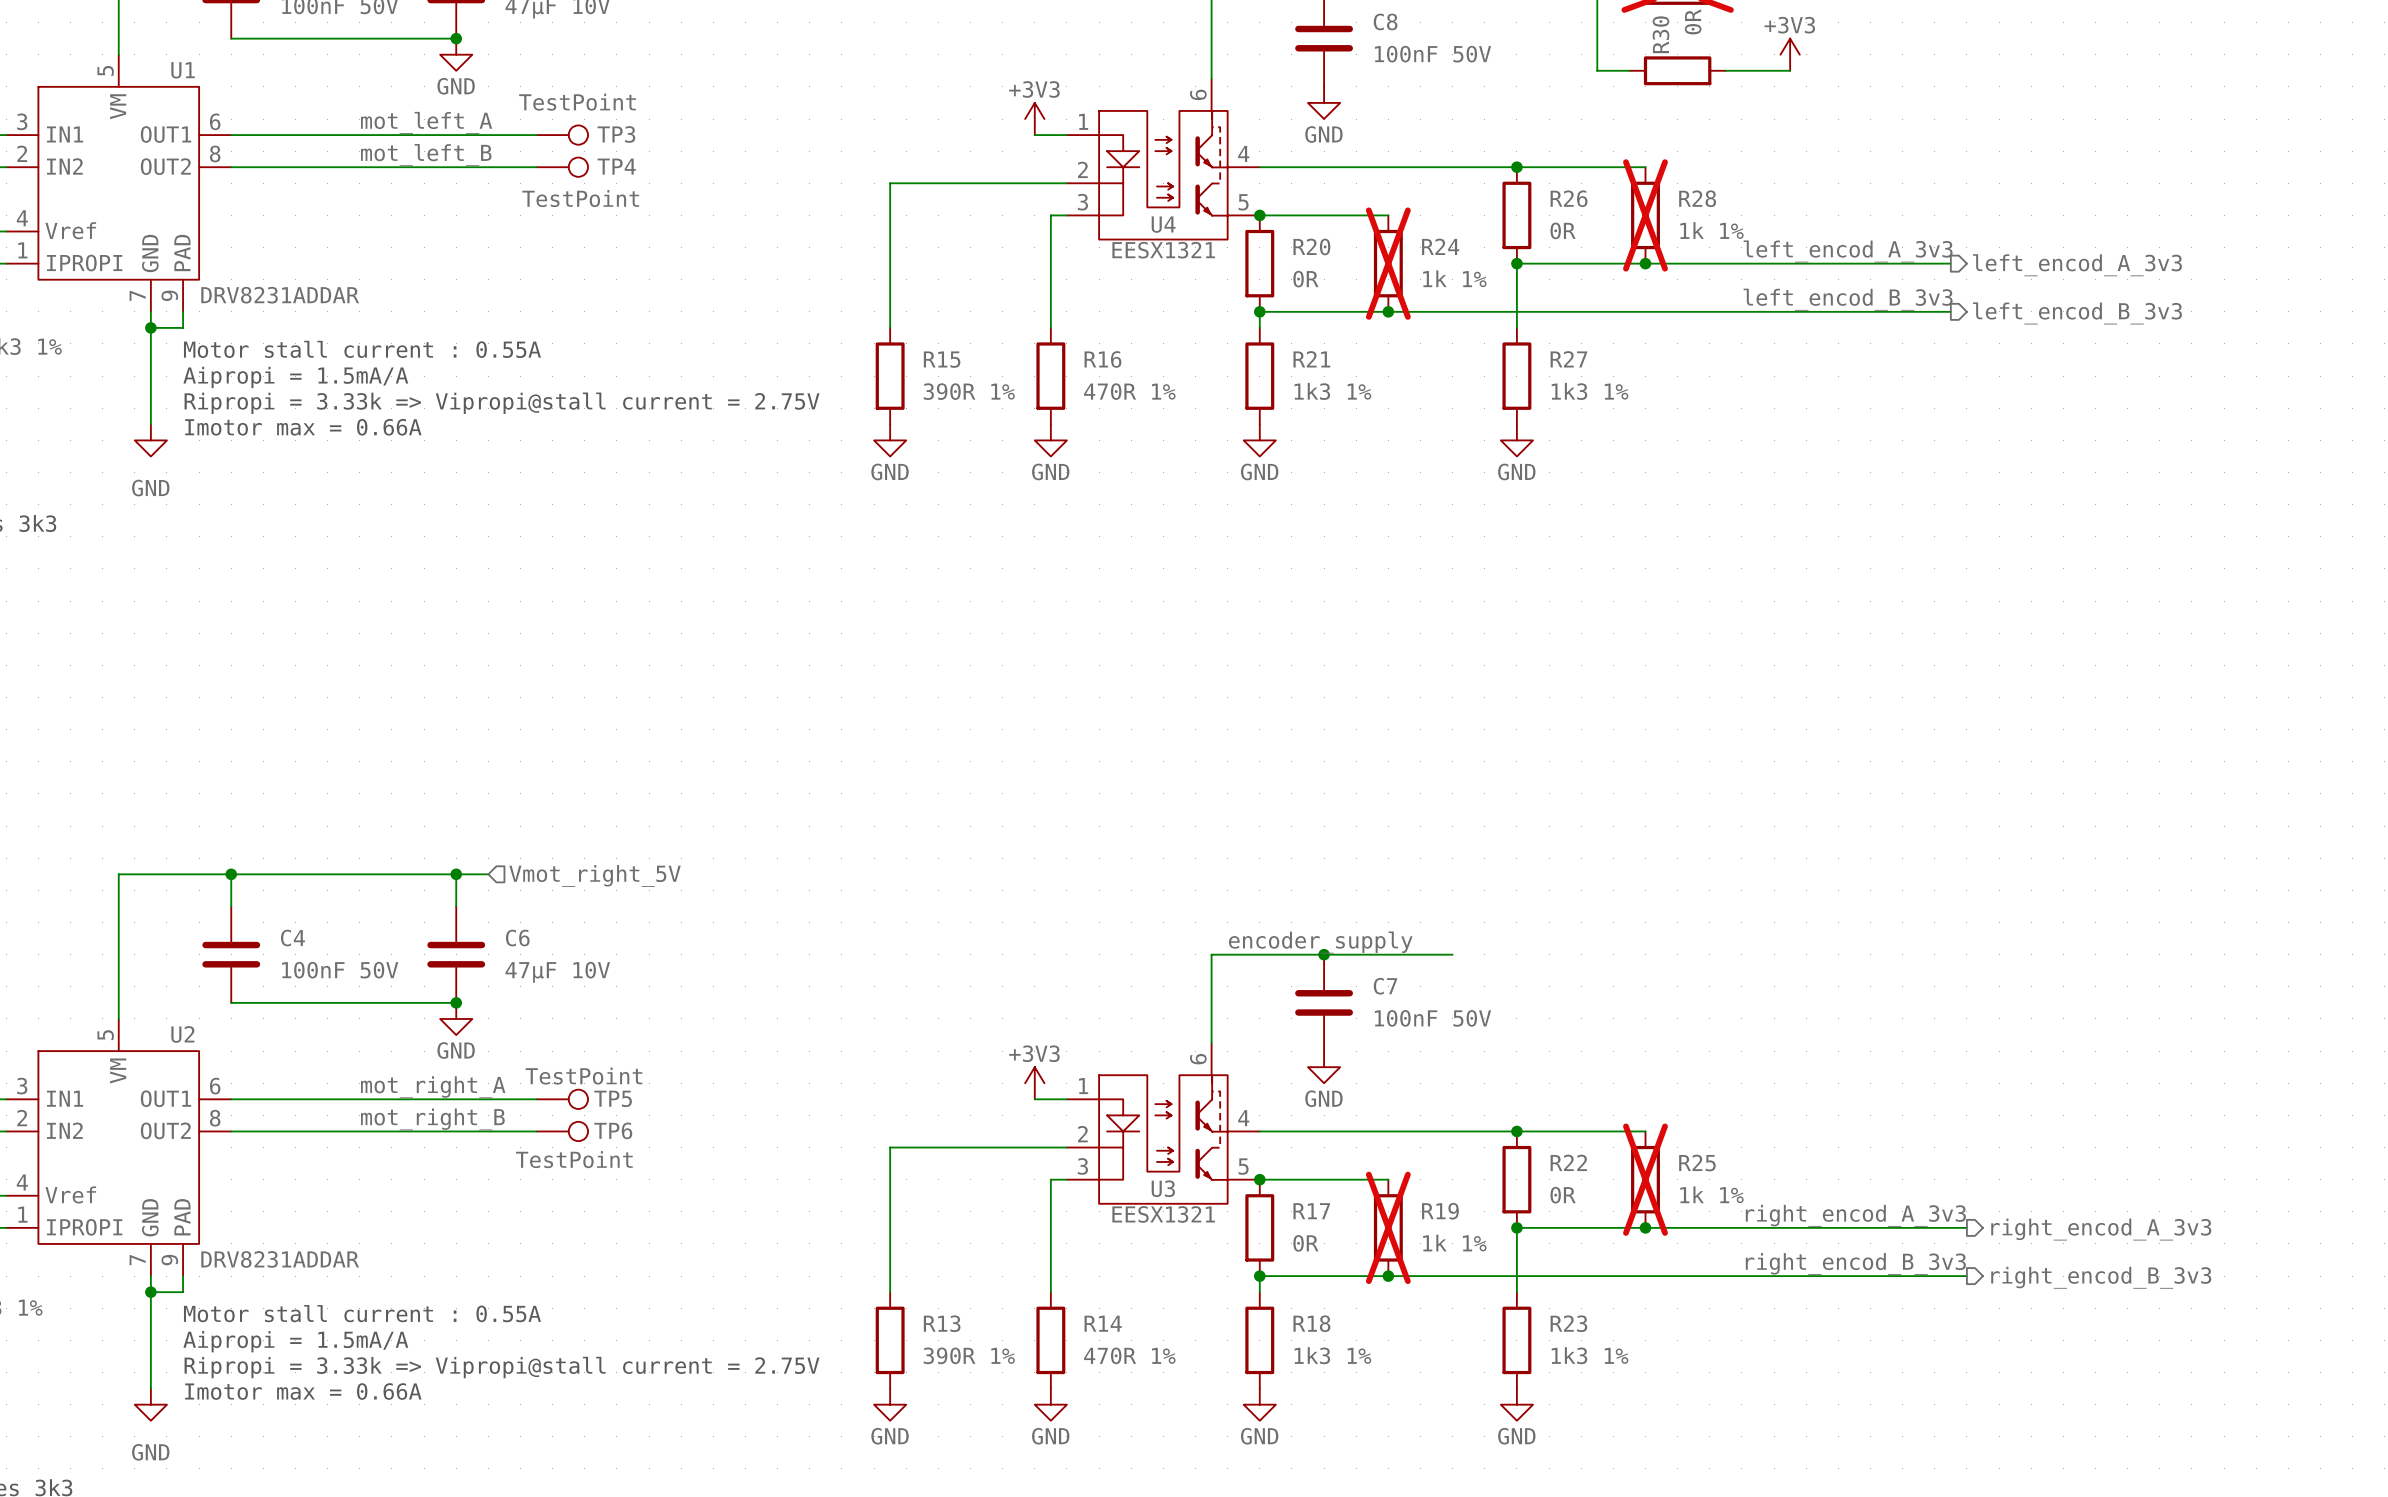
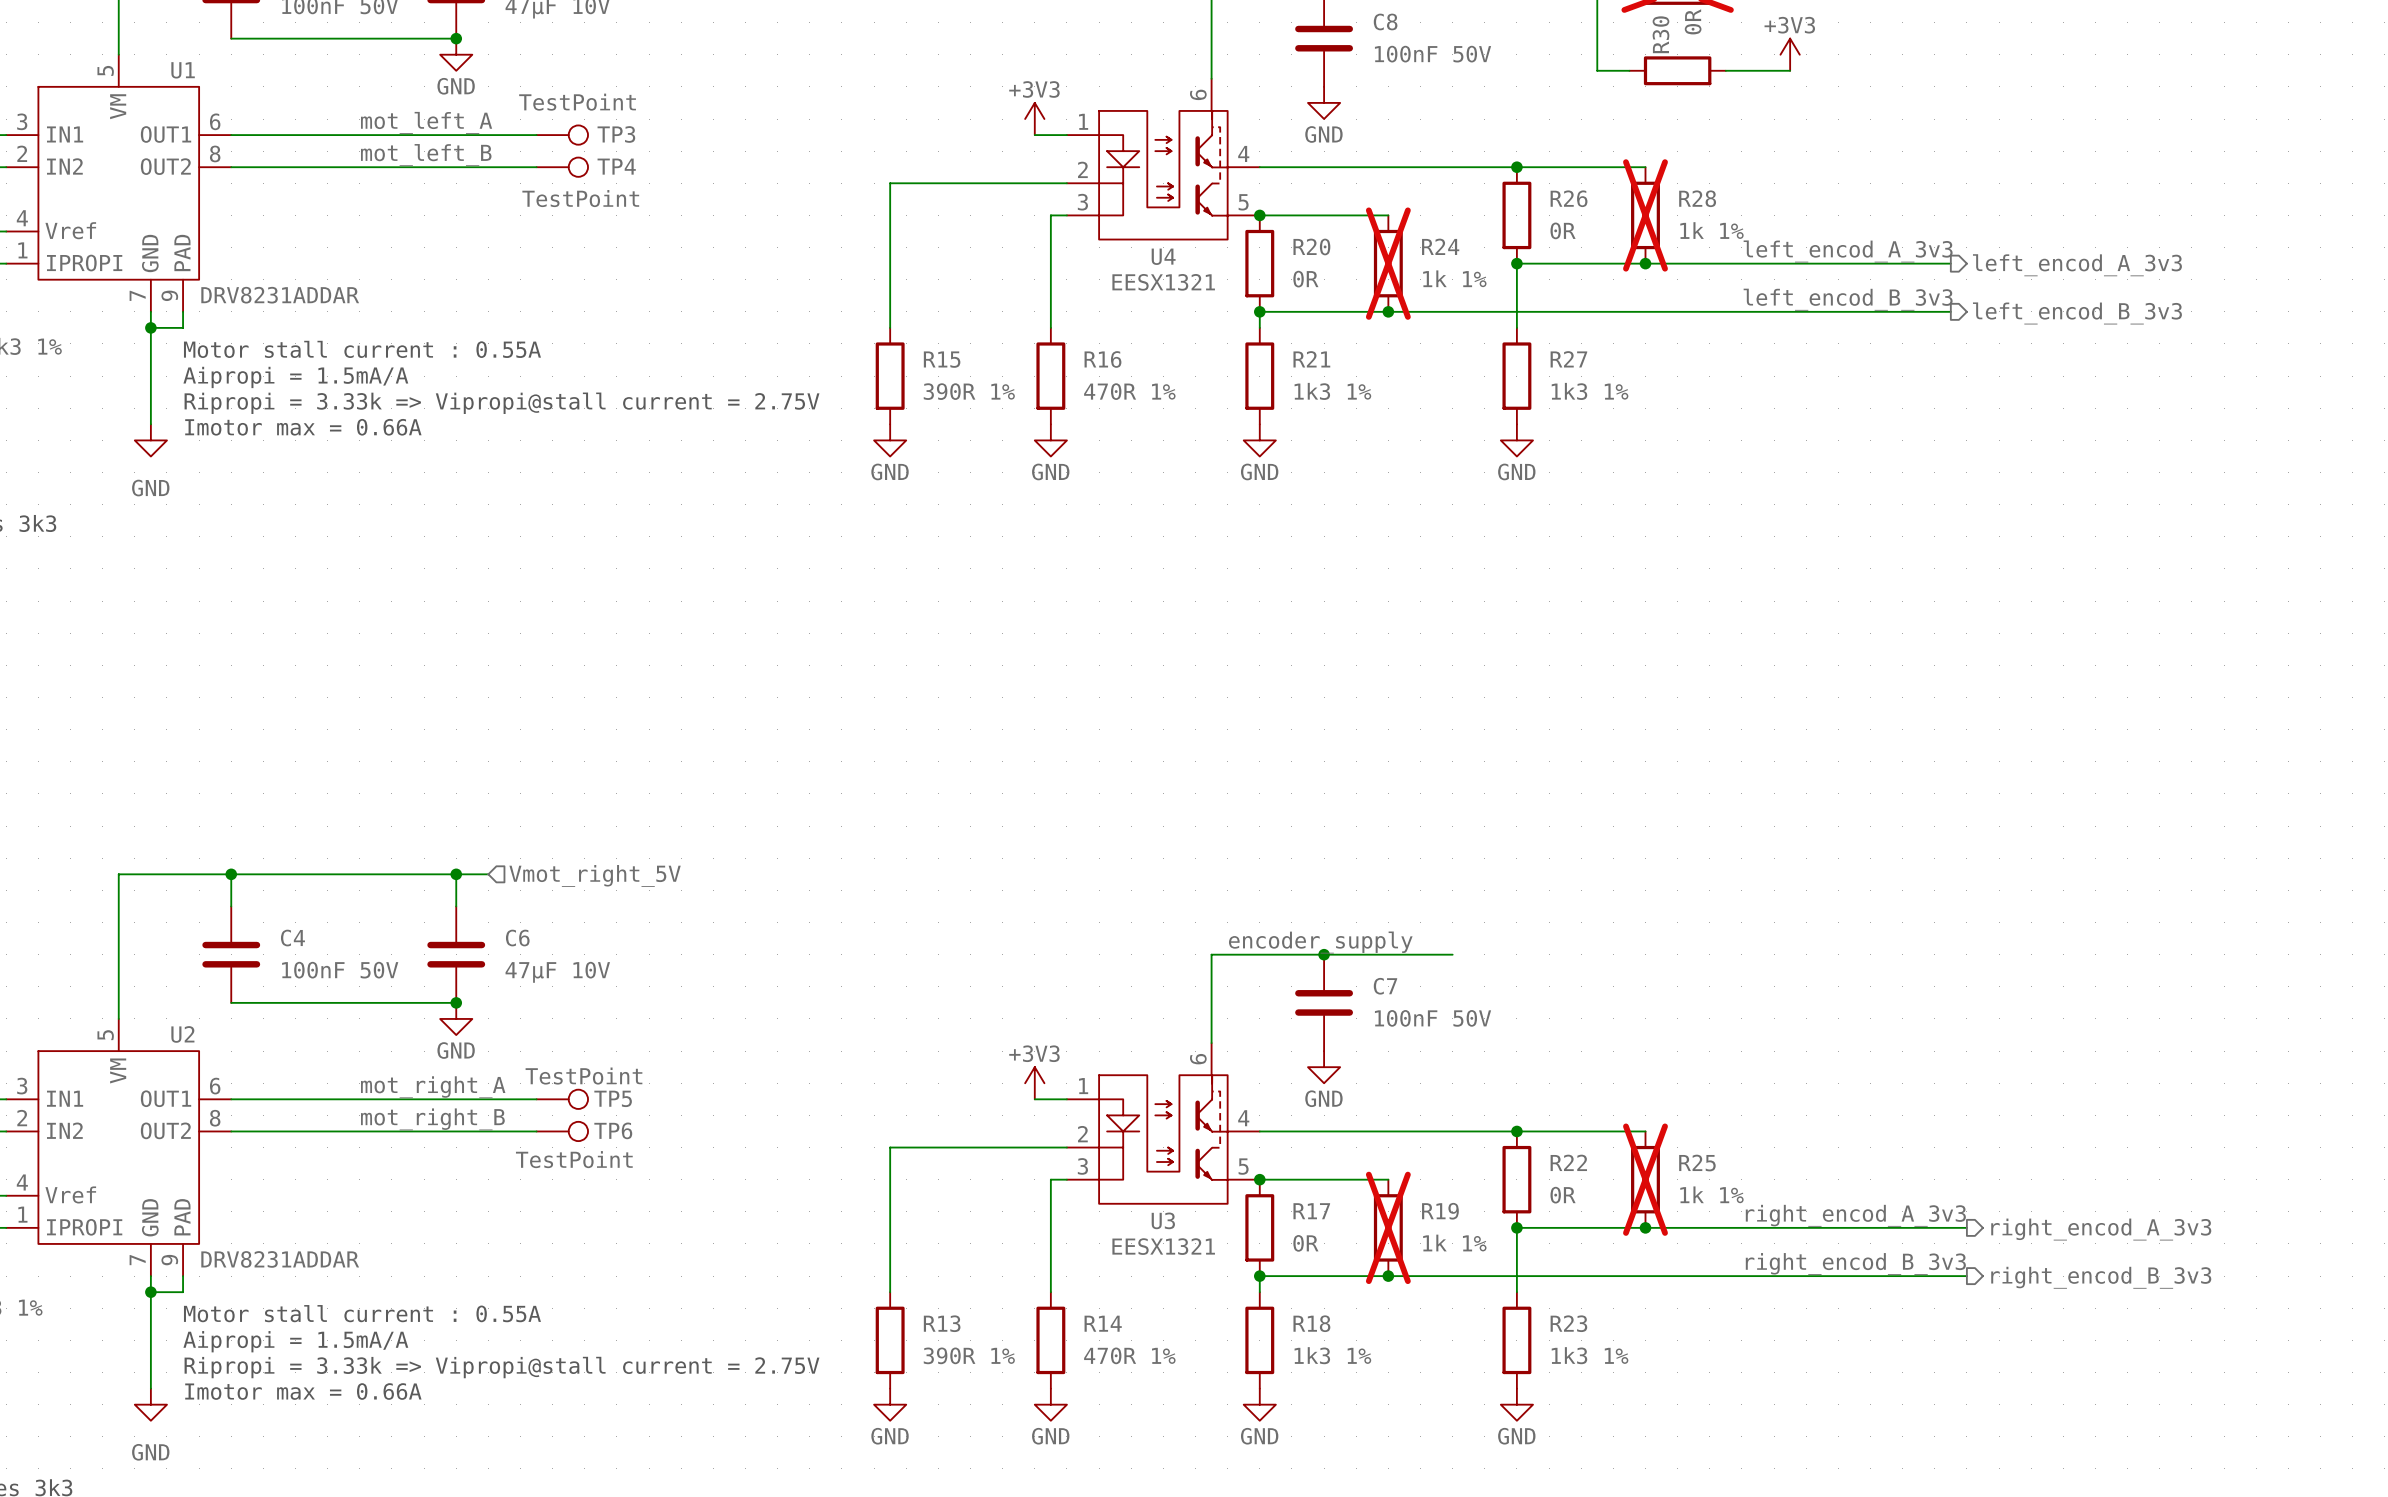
U4 name position: U4 (1163, 224) -> U4 (1163, 256)
U4 value position: EESX1321 (1163, 250) -> EESX1321 (1163, 282)
U3 name position: U3 (1163, 1188) -> U3 (1163, 1220)
U3 value position: EESX1321 (1163, 1214) -> EESX1321 (1163, 1246)

